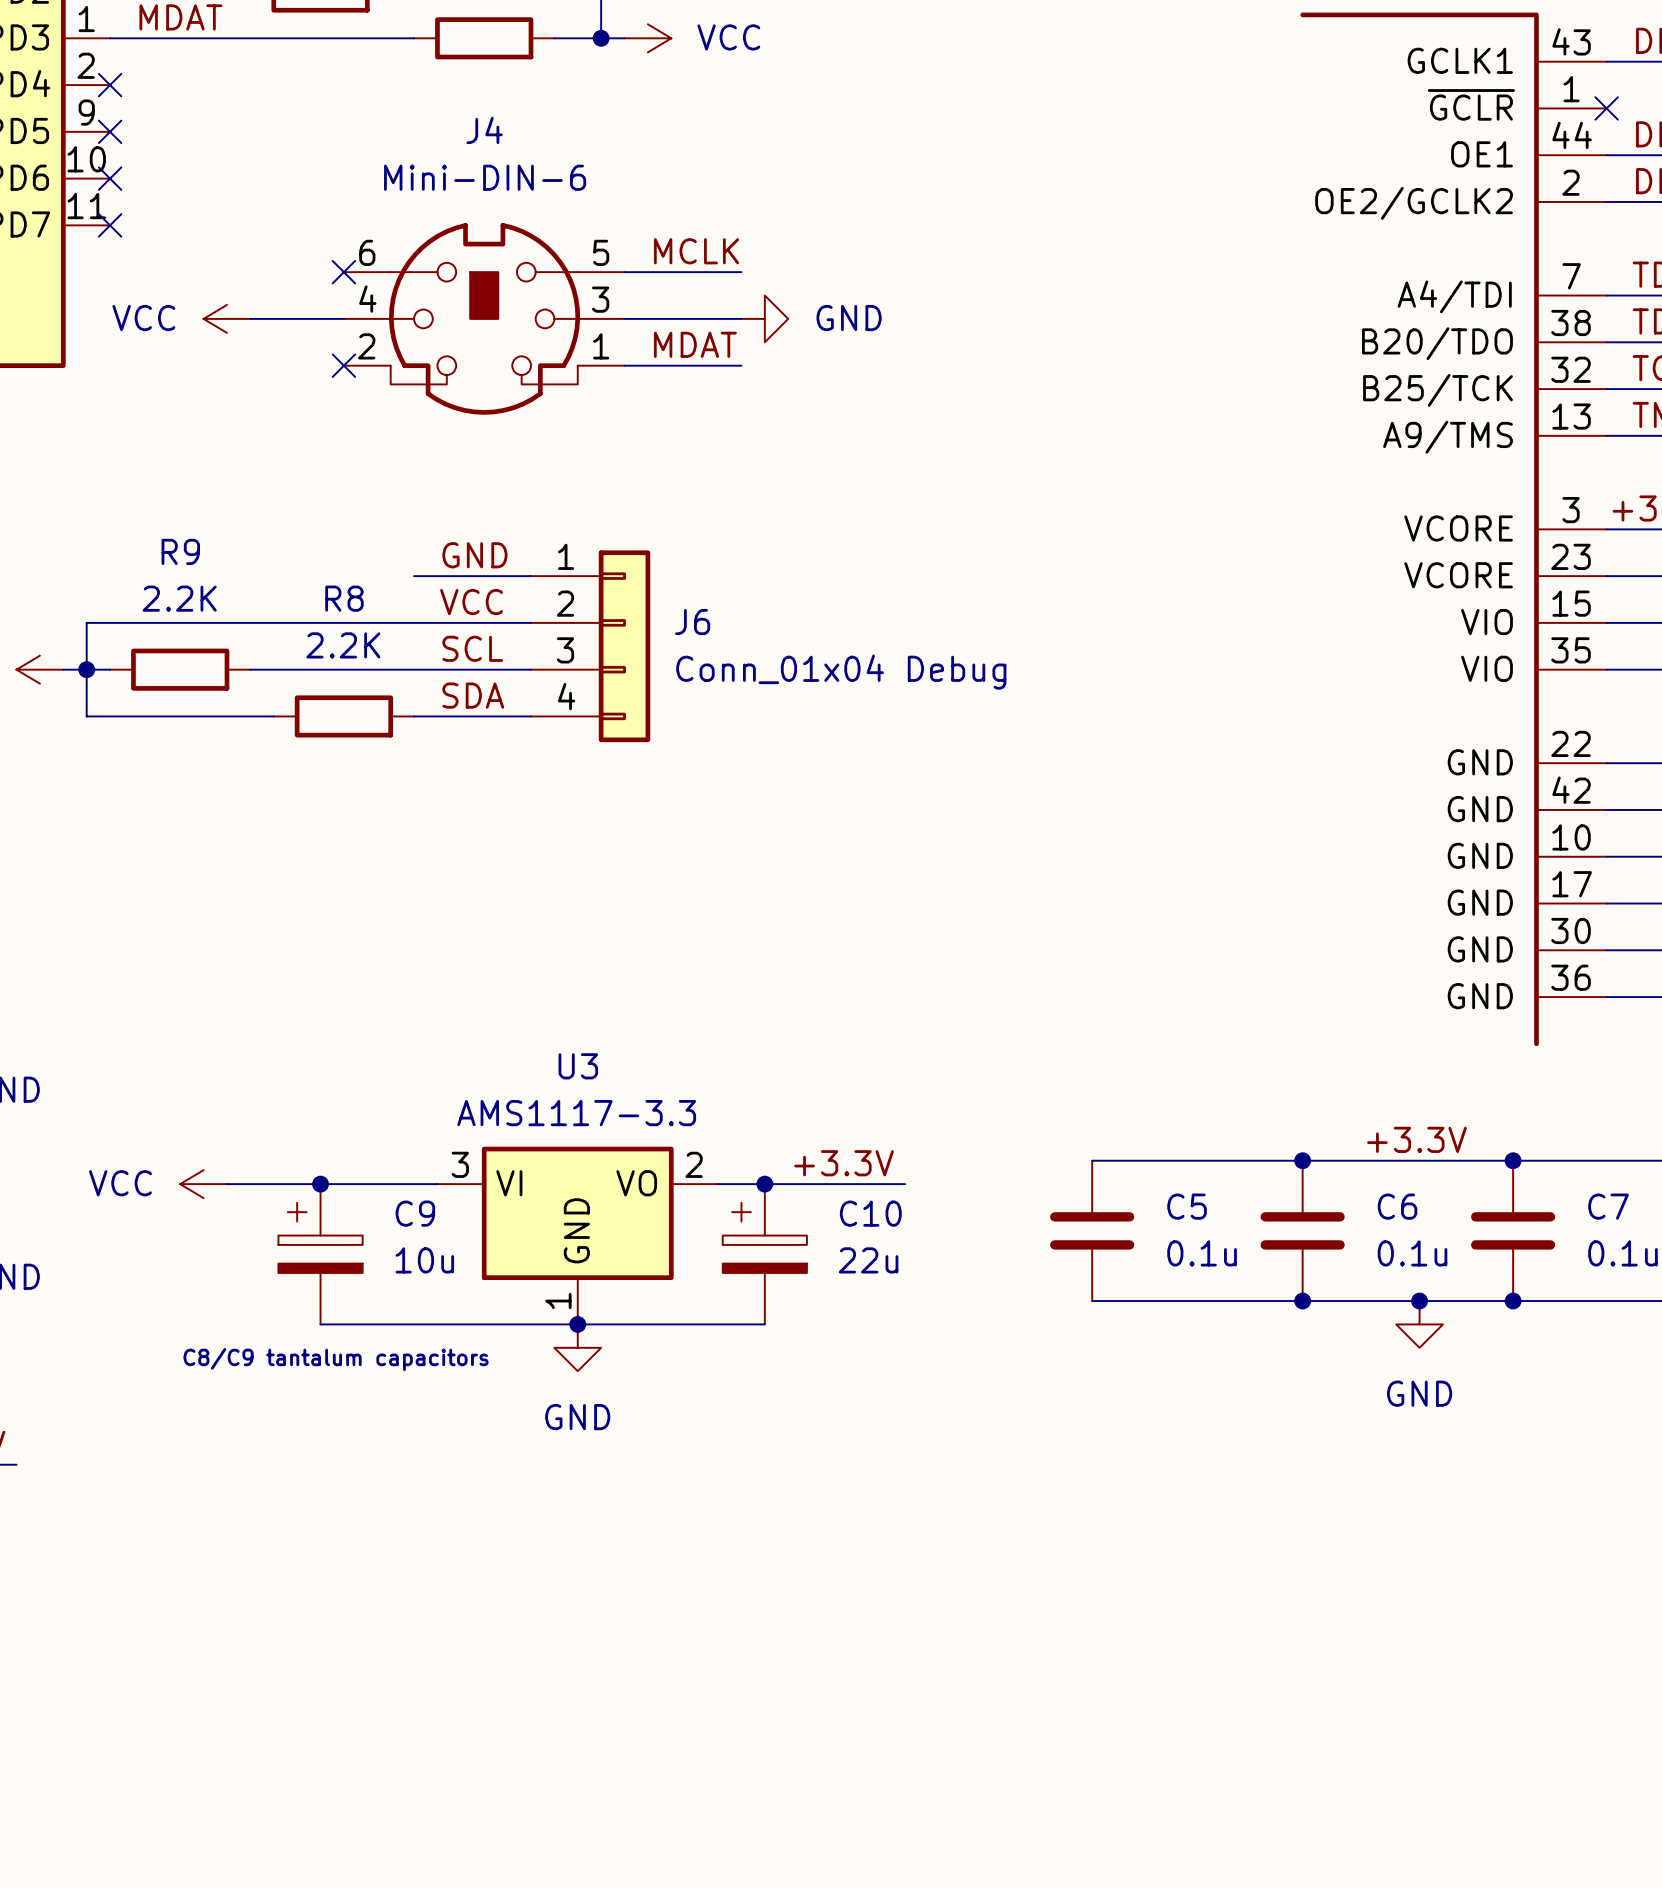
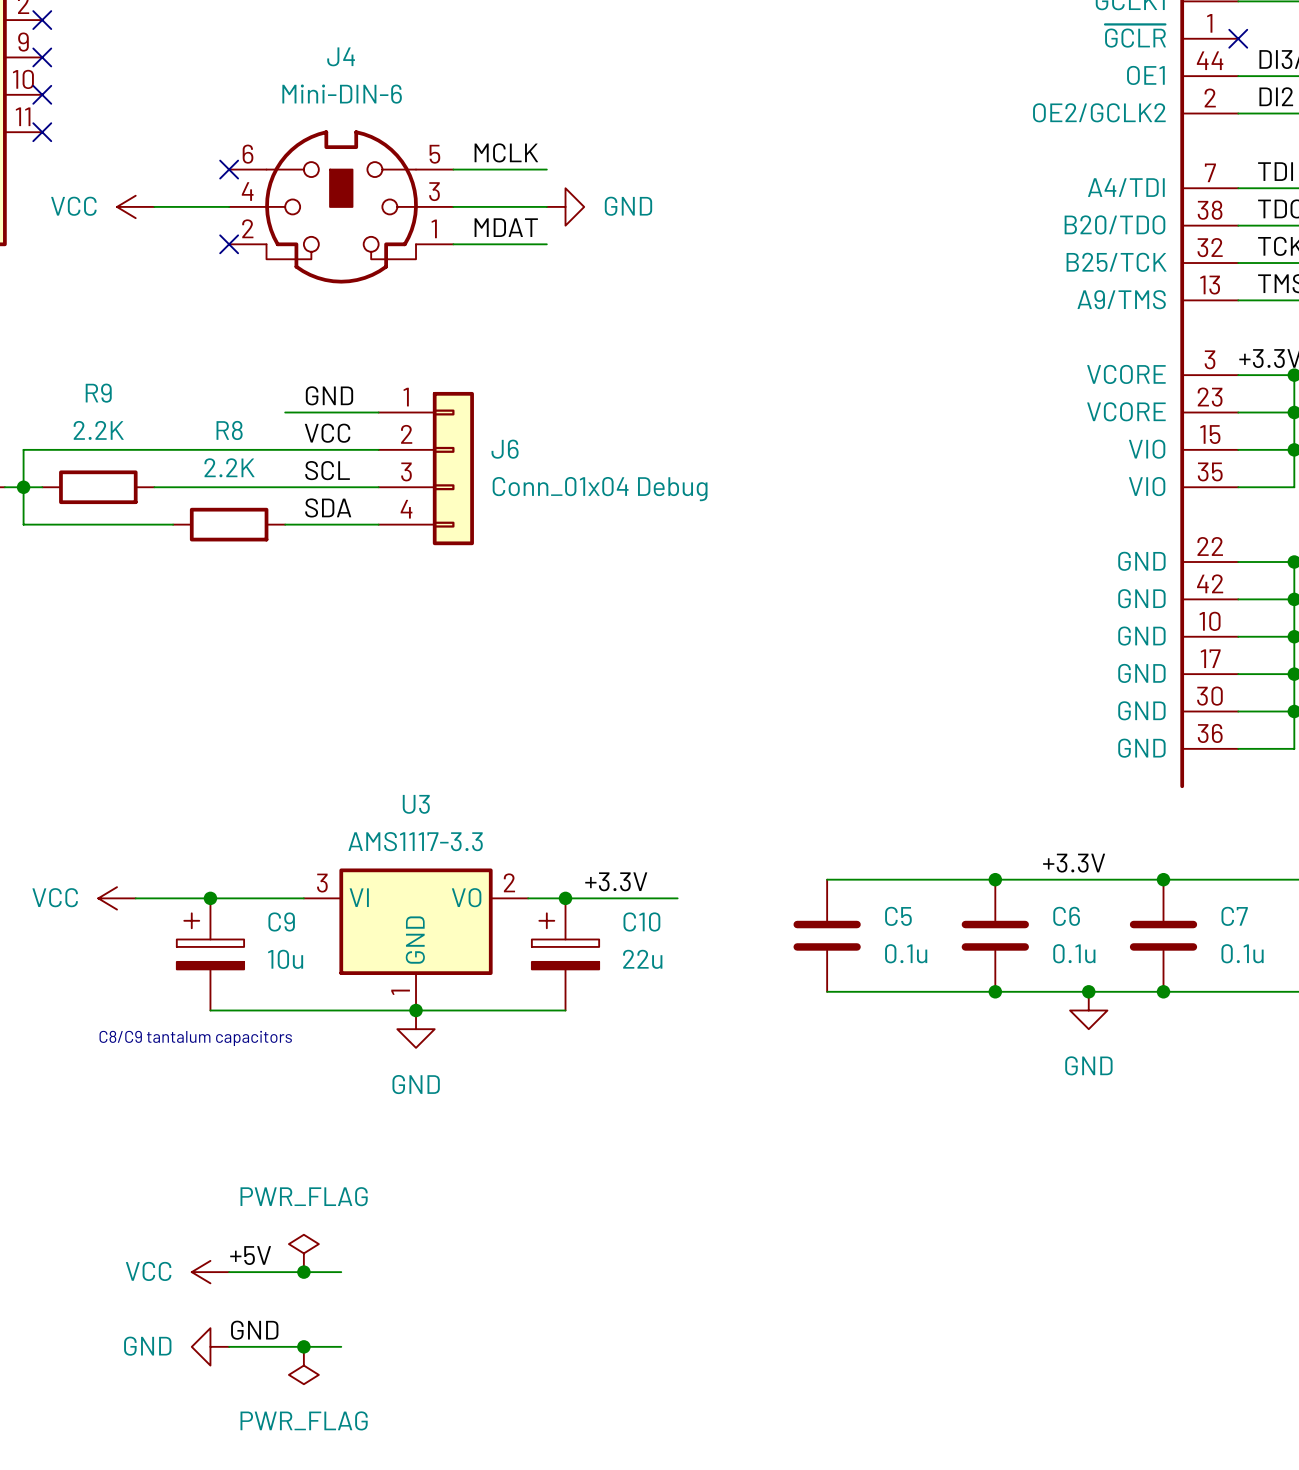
power symbol: none -> PWR_FLAG (303, 1253)
label: none -> +5V (250, 1255)
power symbol: none -> VCC (210, 1272)
wire: none -> (229, 1272) (341, 1272)
junction: none -> (303, 1272)
label: none -> GND (254, 1330)
power symbol: none -> GND (210, 1346)
wire: none -> (229, 1346) (341, 1346)
junction: none -> (303, 1346)
power symbol: none -> PWR_FLAG (303, 1365)

